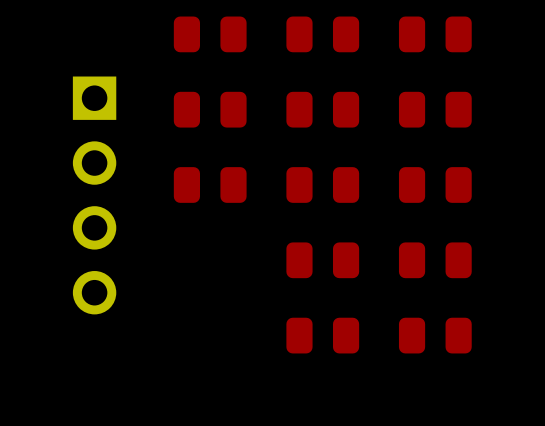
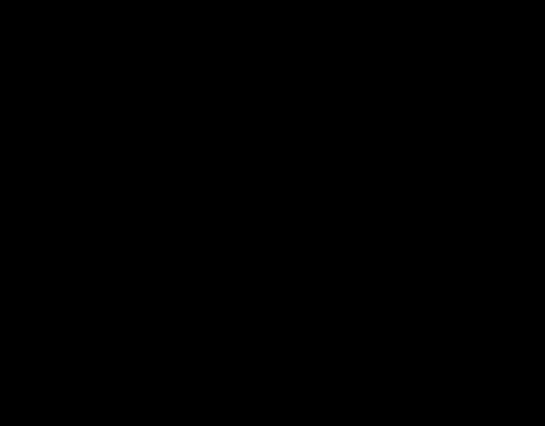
part: (210, 34) -> none
part: (322, 34) -> none
part: (435, 34) -> none
part: (210, 109) -> none
part: (322, 109) -> none
part: (435, 109) -> none
part: (210, 184) -> none
part: (322, 184) -> none
part: (435, 184) -> none
part: (94, 195) -> none
part: (322, 260) -> none
part: (435, 260) -> none
part: (322, 335) -> none
part: (435, 335) -> none

